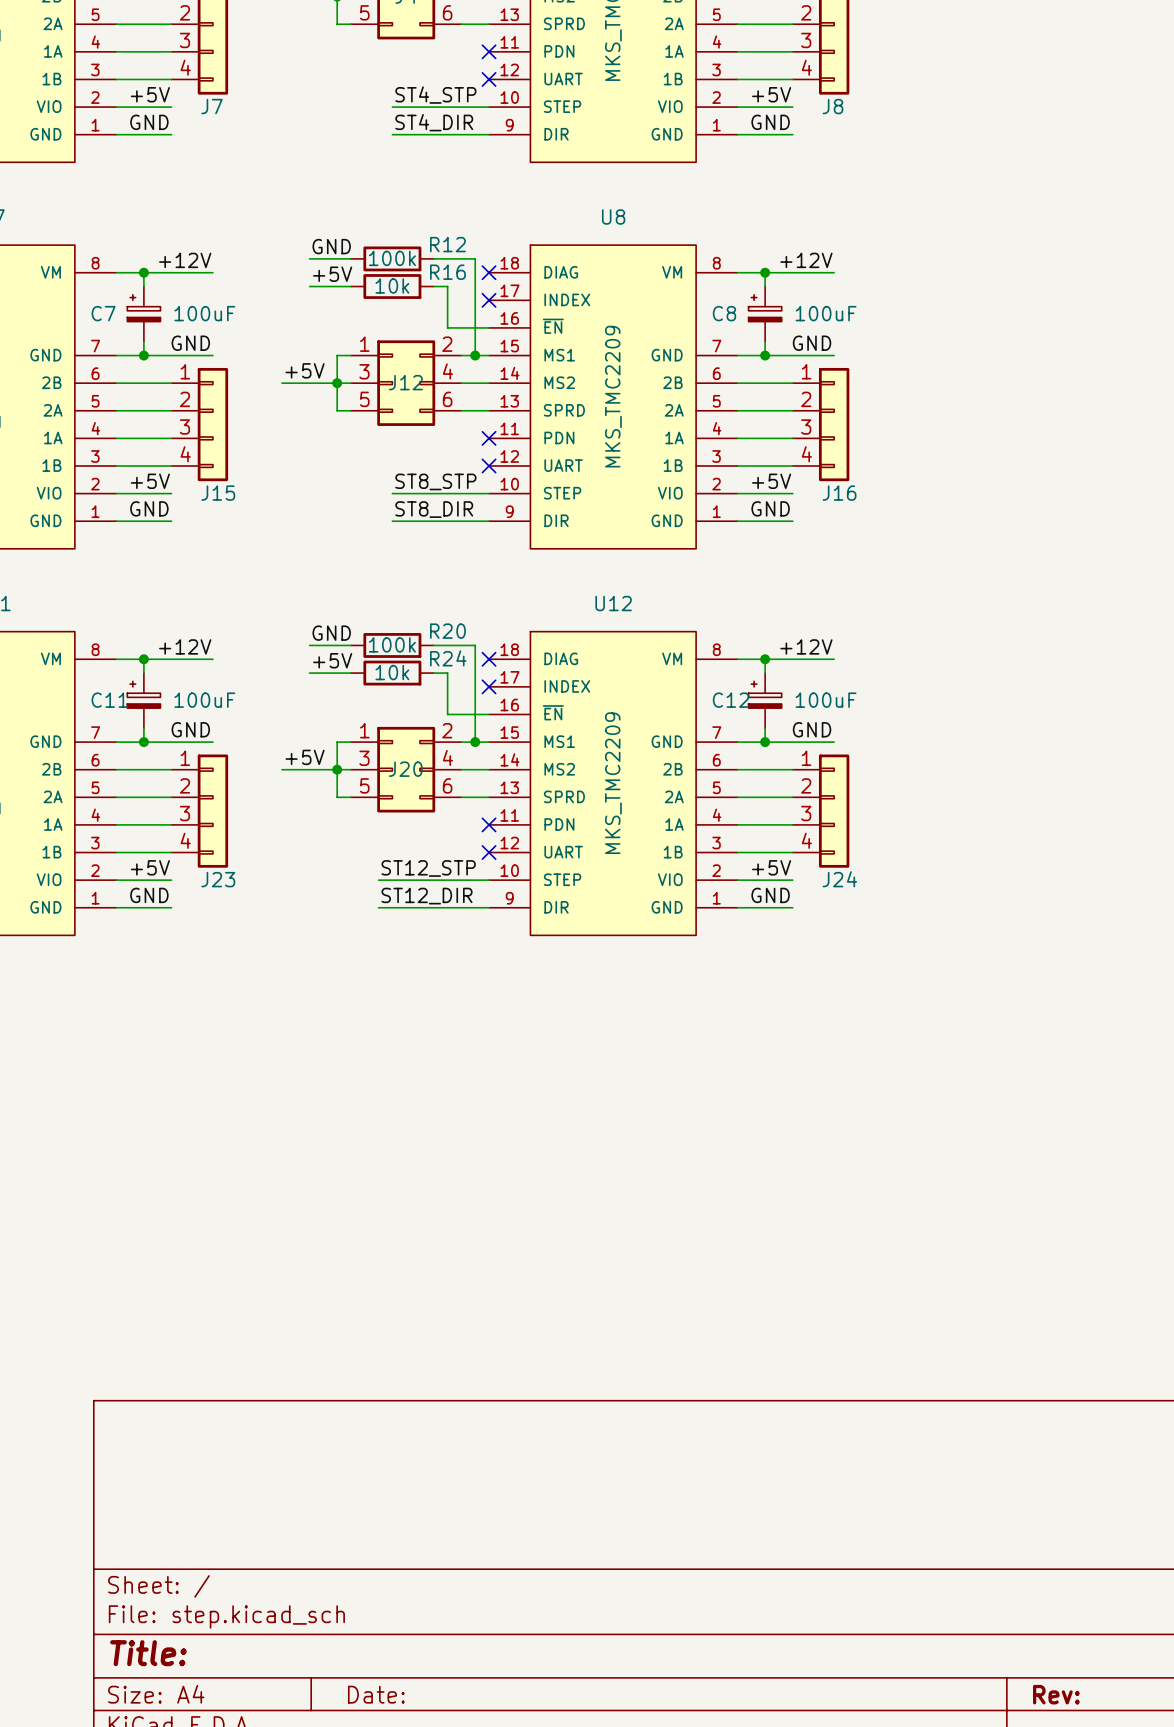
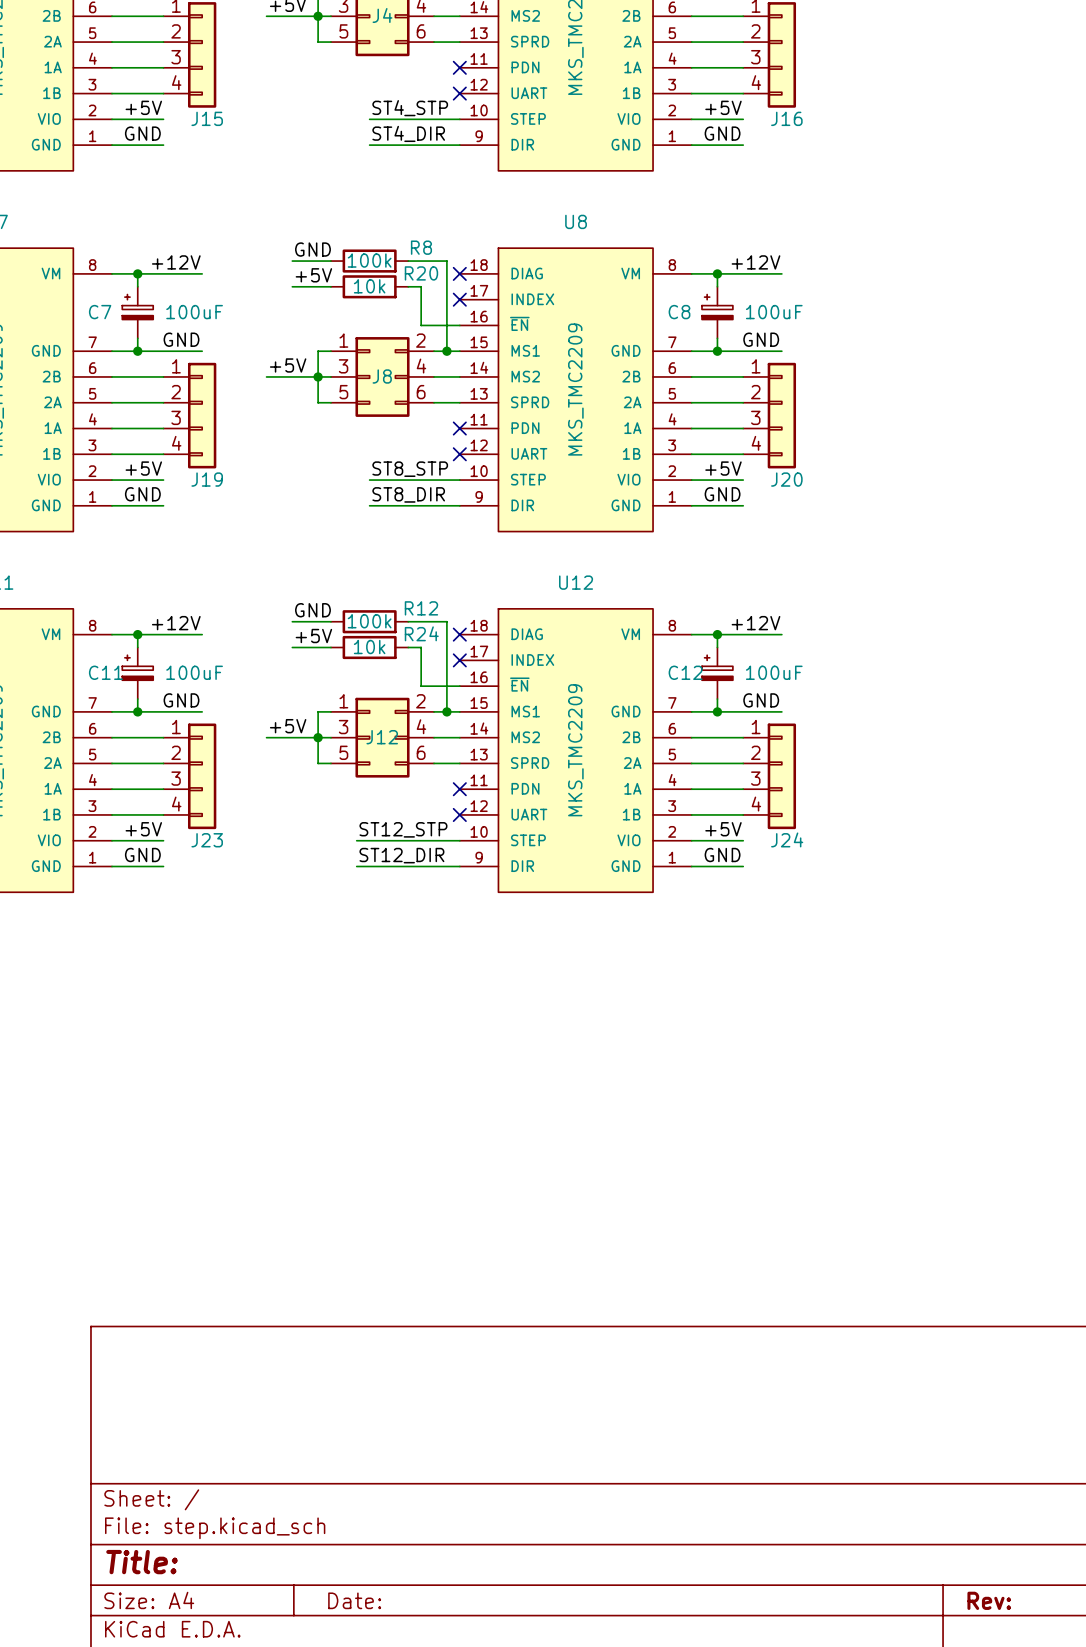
J7 name: J7 (212, 106) -> J15 (207, 118)
J8 name: J8 (832, 106) -> J16 (786, 118)
R12 name: R12 (447, 244) -> R8 (421, 247)
R16 name: R16 (447, 272) -> R20 (421, 273)
J12 name: J12 (405, 382) -> J8 (382, 376)
J15 name: J15 (218, 493) -> J19 (207, 479)
J16 name: J16 (839, 493) -> J20 (786, 479)
R20 name: R20 (447, 631) -> R12 (421, 608)
J20 name: J20 (405, 769) -> J12 (382, 737)

